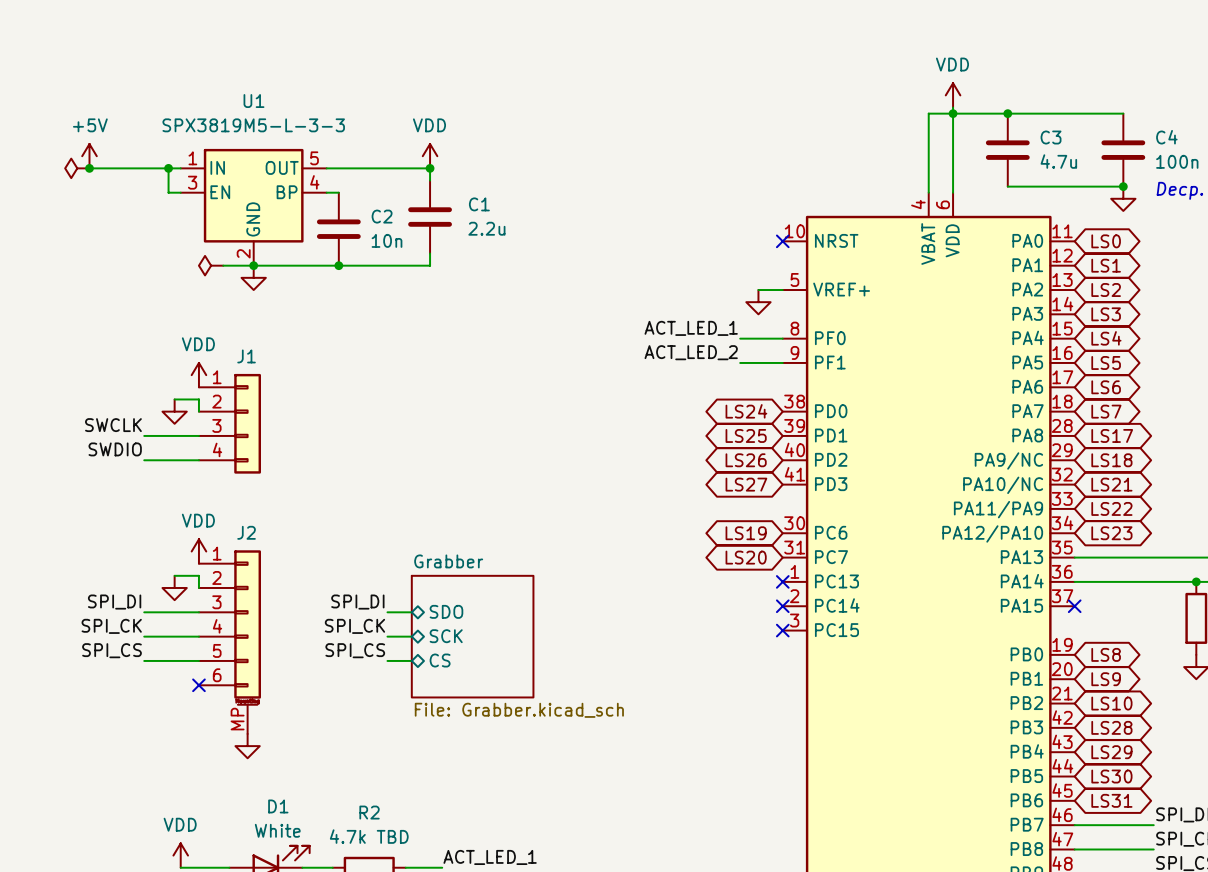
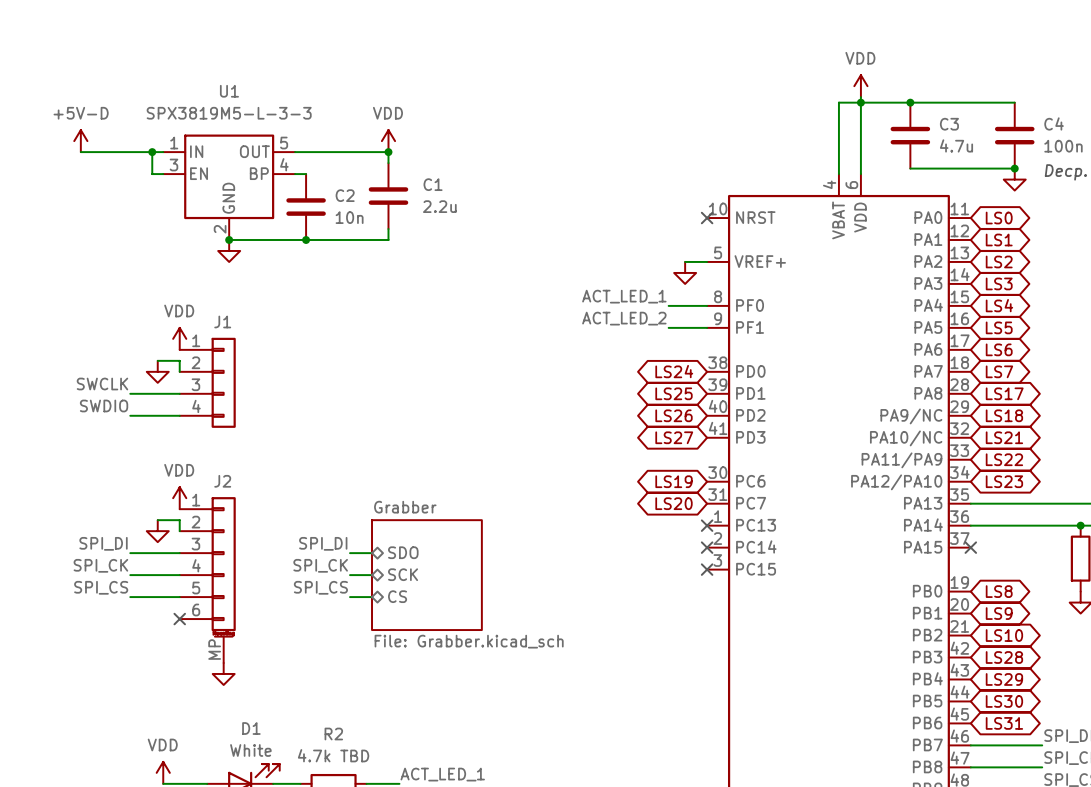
power symbol: +5V (89, 156) -> +5V-D (80, 141)
power symbol: (77, 168) -> none
junction: (89, 168) -> none
power symbol: (211, 265) -> none
wire: (223, 265) (253, 265) -> none

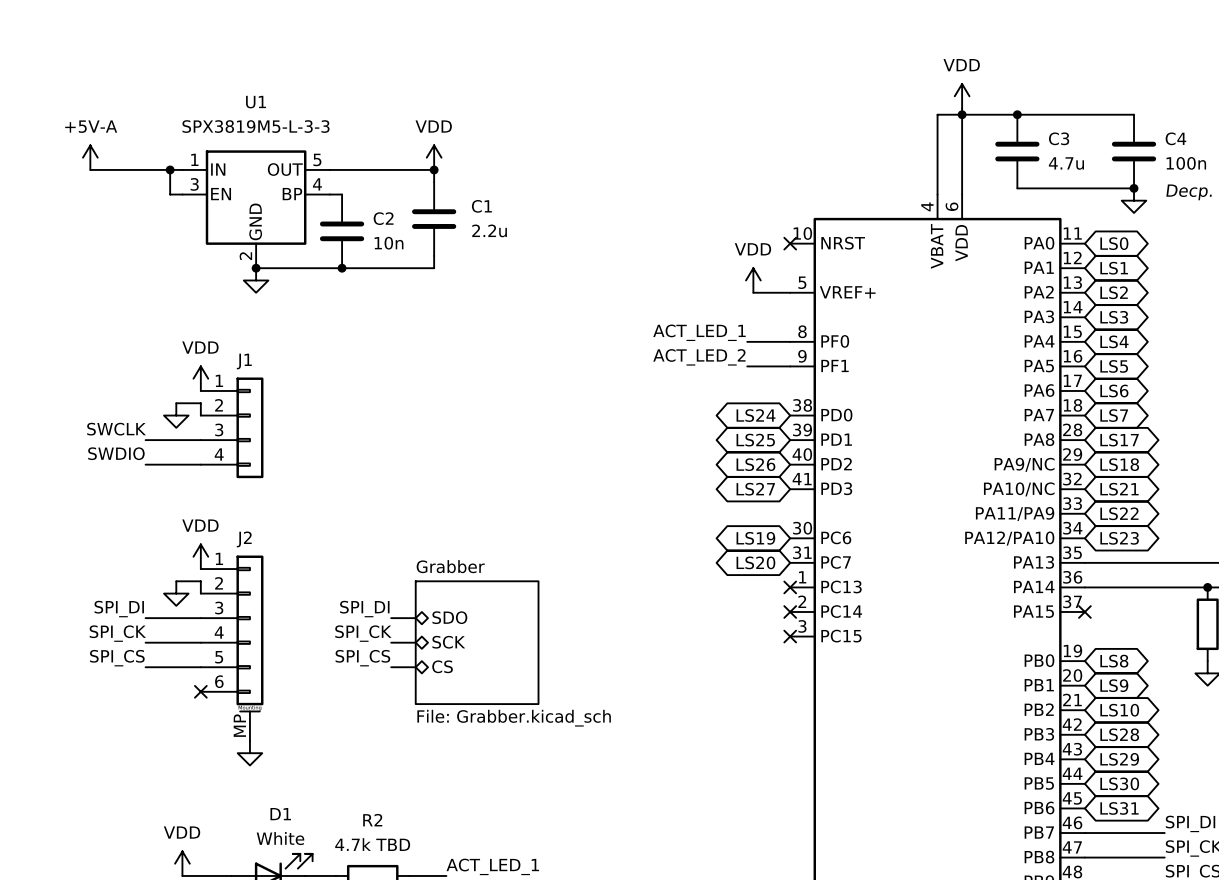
power symbol: +5V-D (80, 141) -> +5V-A (90, 157)
power symbol: none -> VDD (753, 280)
wire: none -> (753, 292) (765, 292)
power symbol: (685, 272) -> none

